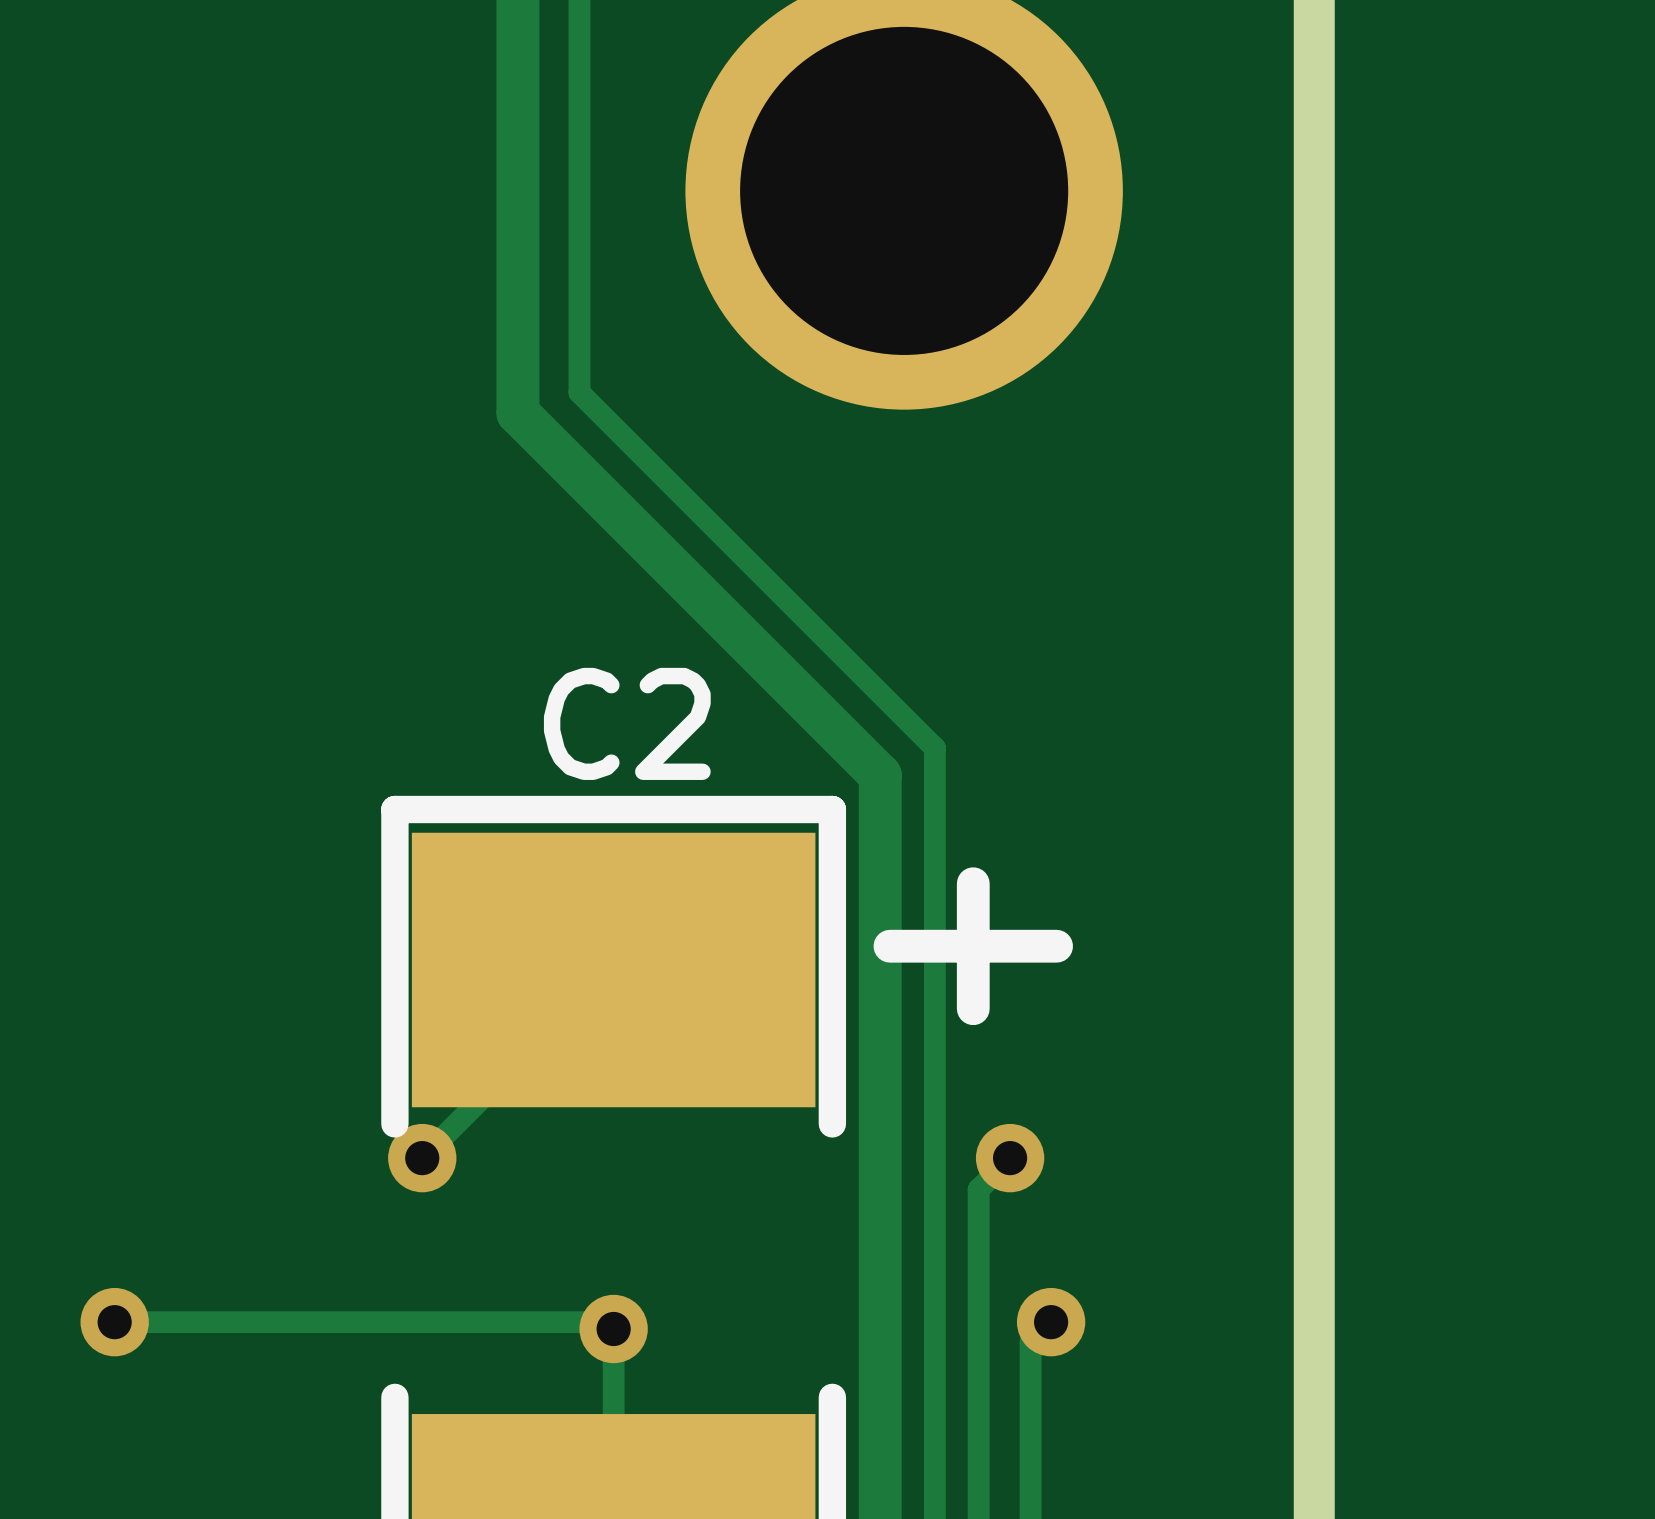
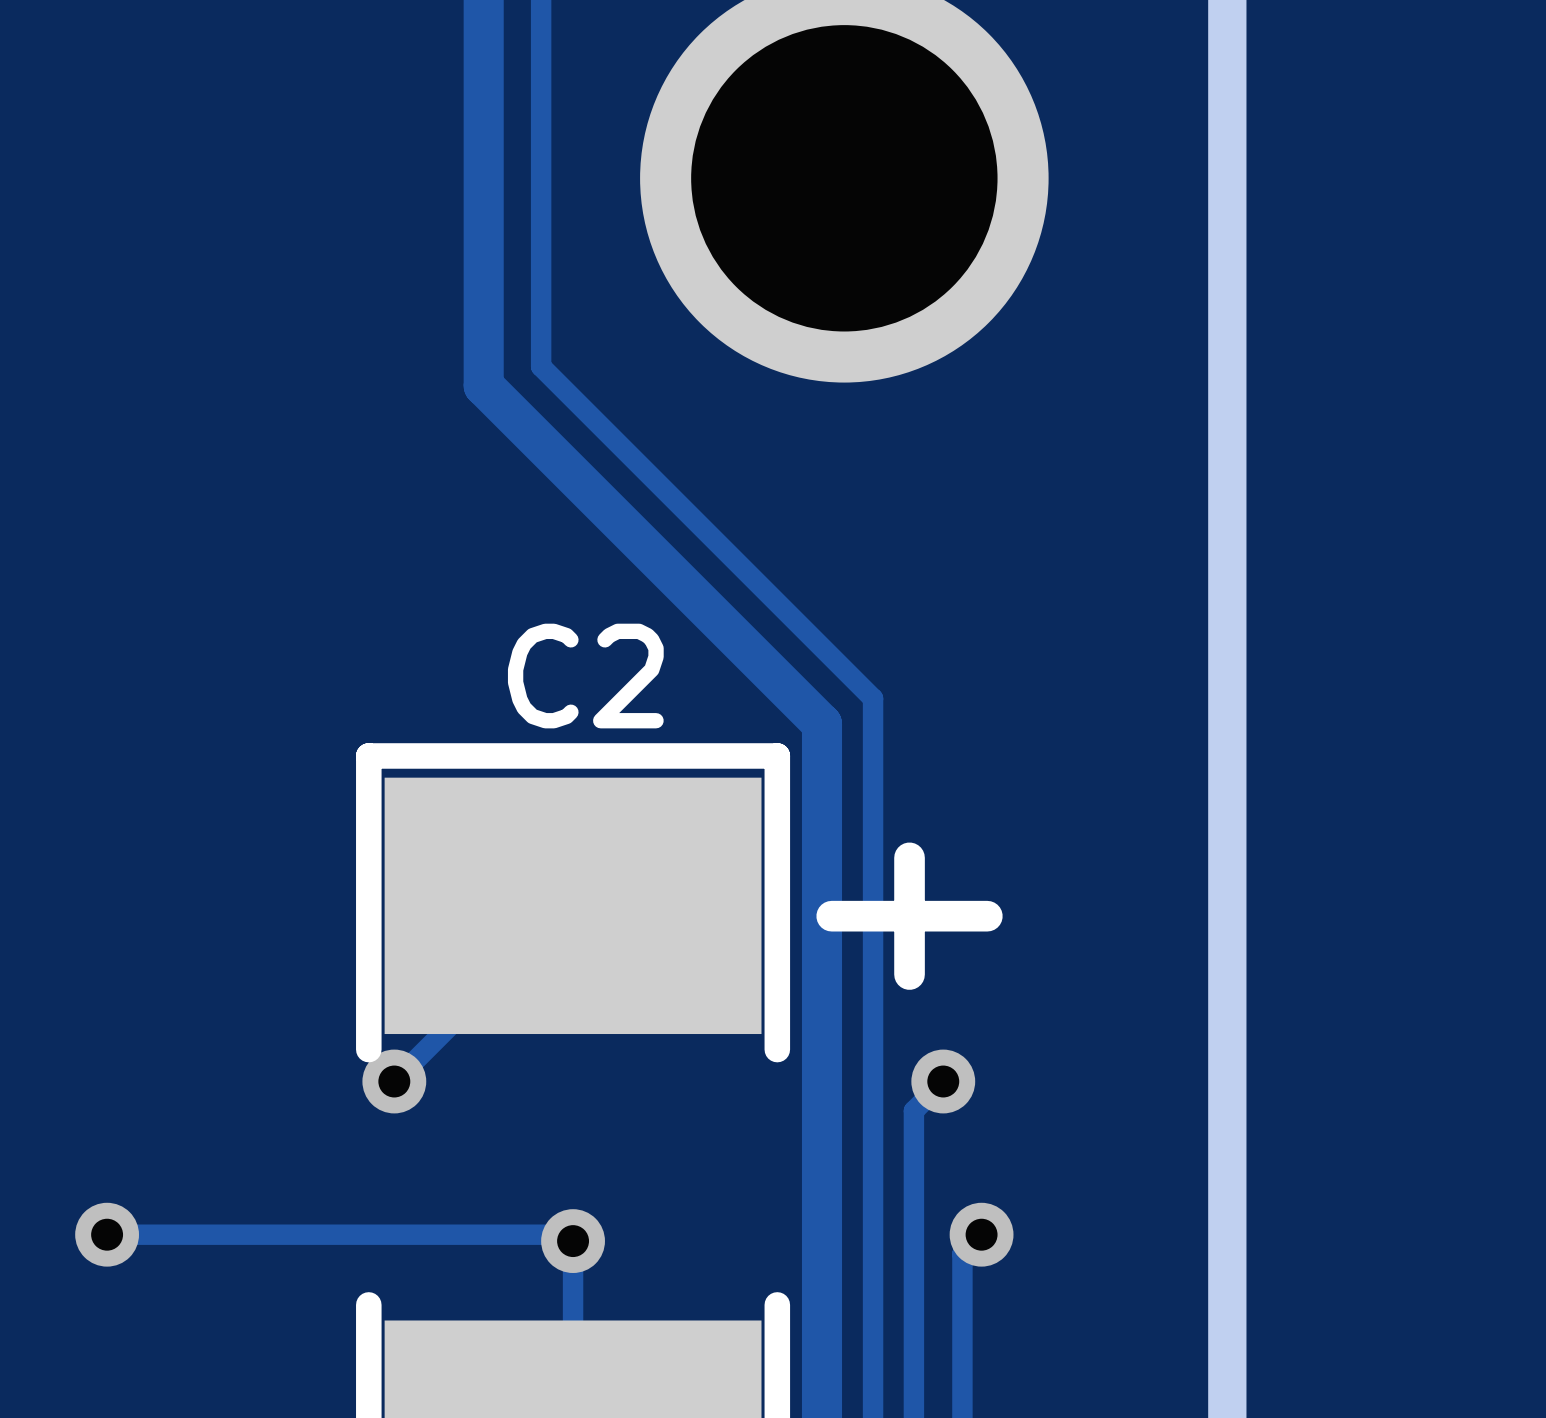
text position: + (973, 946) -> + (909, 916)

